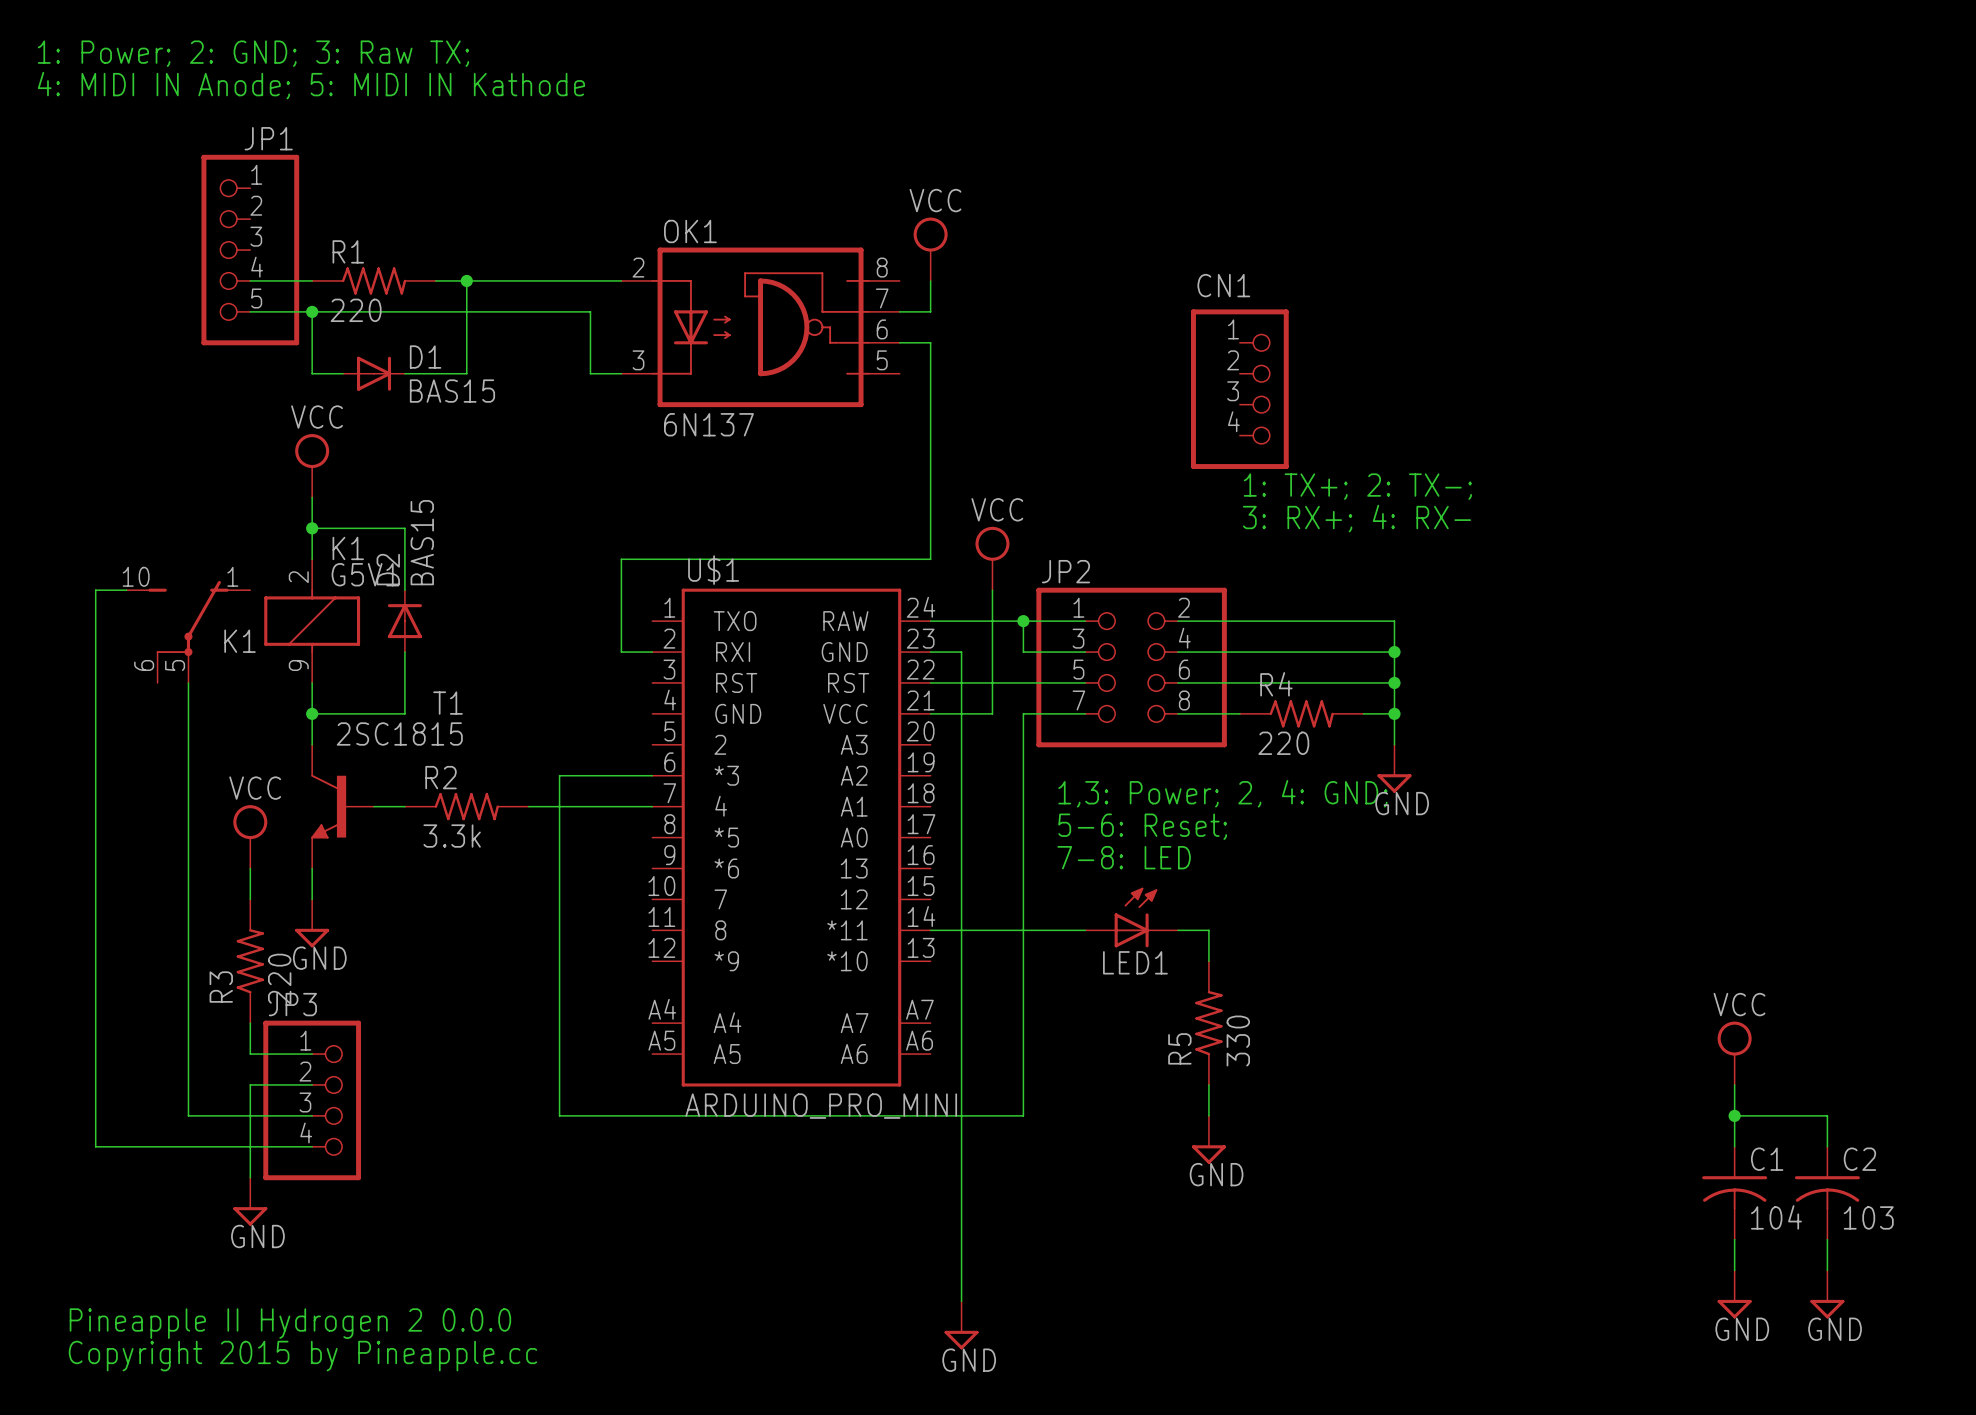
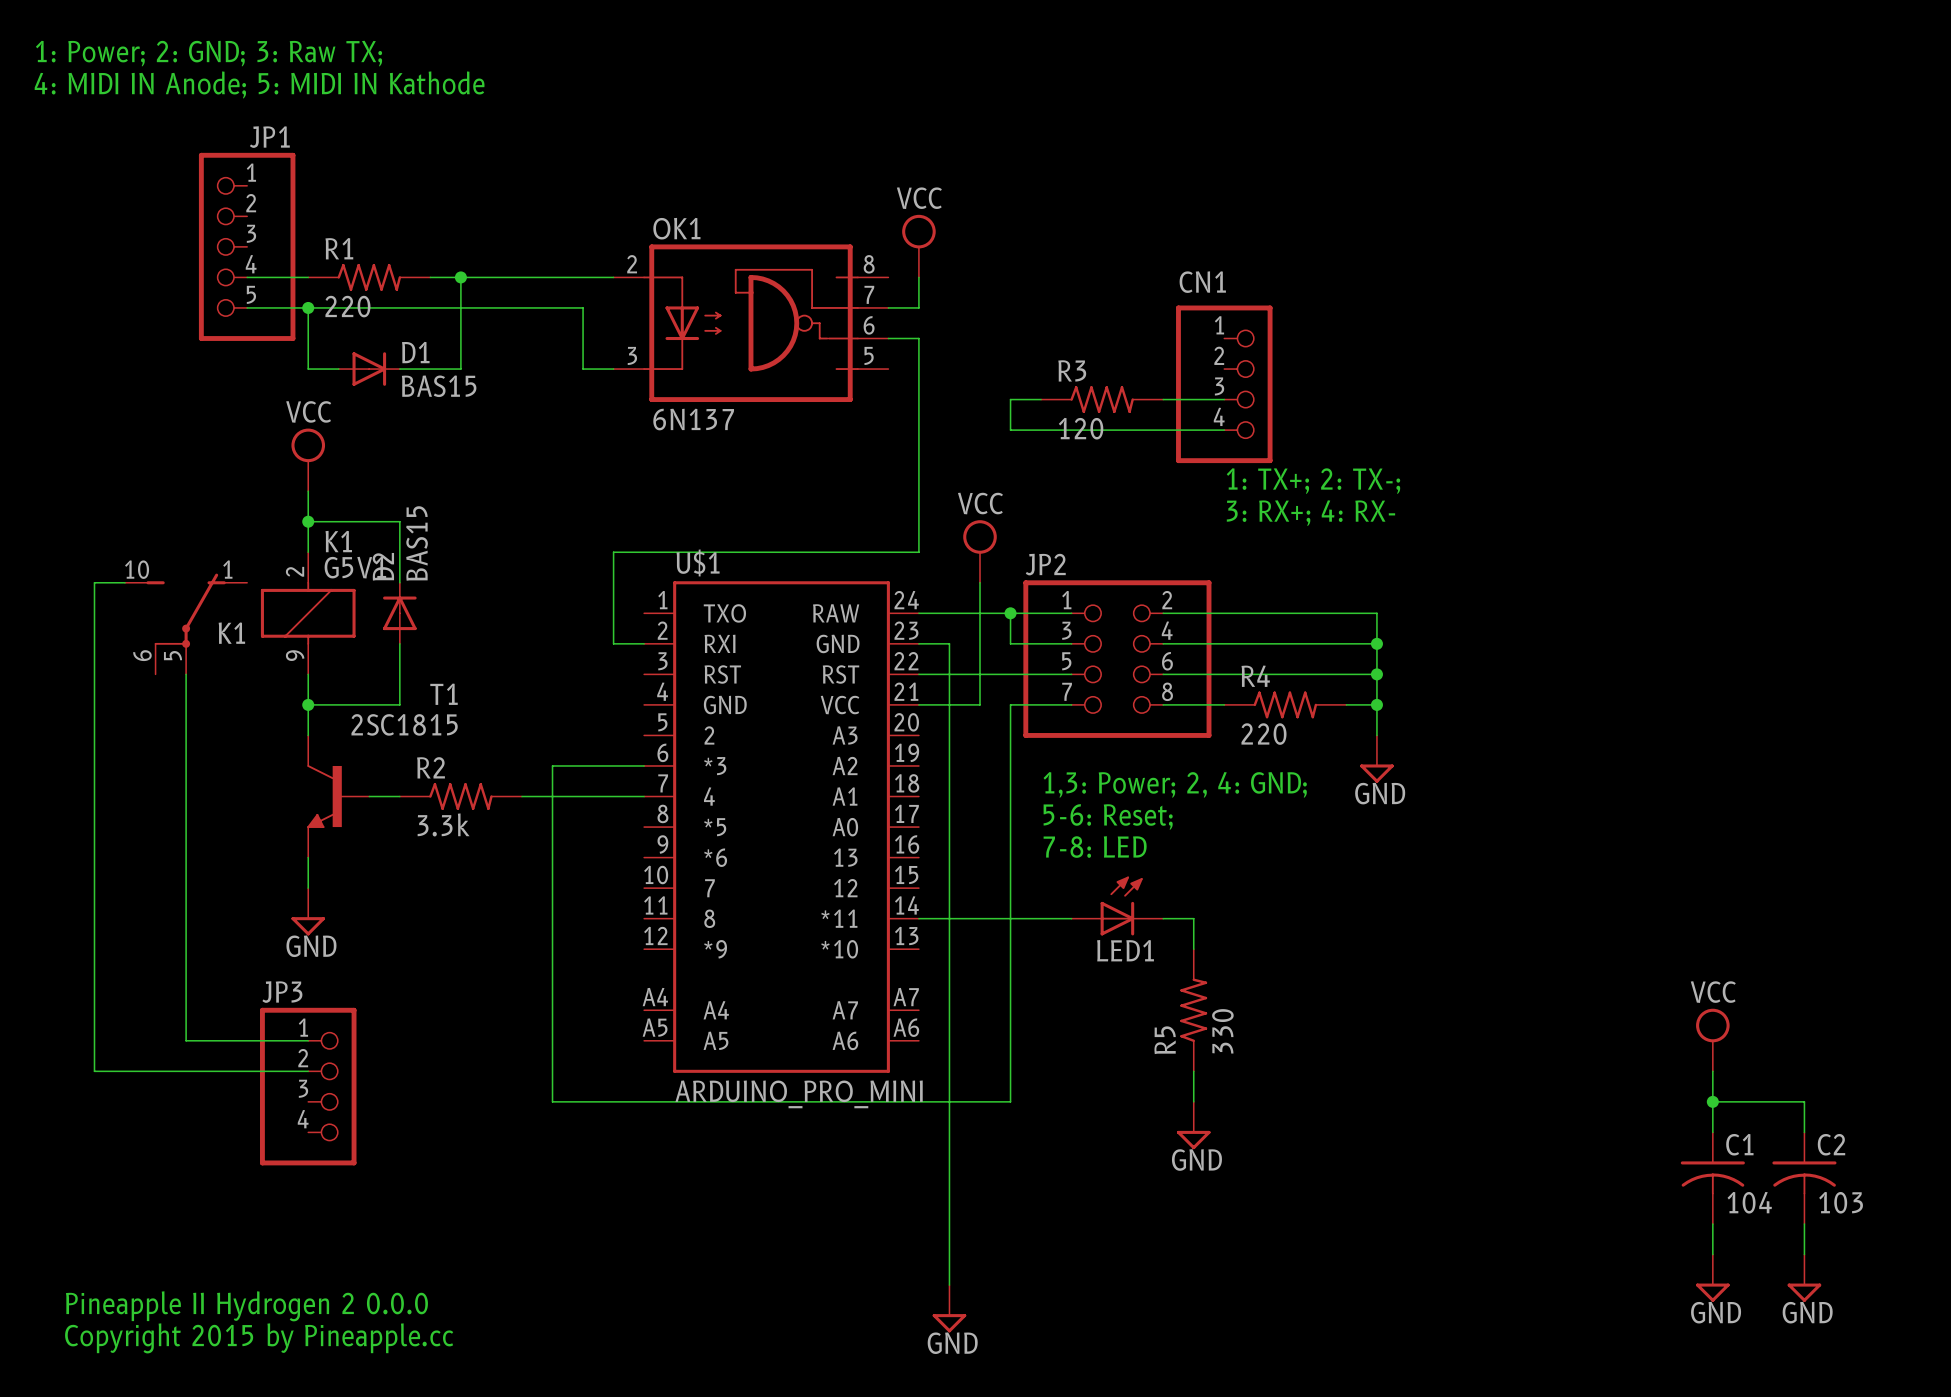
wire: none -> (1041, 399) (1010, 399) (1010, 430) (1224, 430)
wire: none -> (1163, 399) (1224, 399)
power symbol: VCC (250, 836) -> none
wire: (250, 868) (250, 899) -> none
R3 rotation: 0° (250, 961) -> 90° clockwise (1102, 399)
R3 position: (250, 961) -> (1102, 399)
R3 value: 220 (279, 979) -> 120 (1081, 428)
wire: (250, 1023) (250, 1054) -> (186, 1040) (247, 1040)
wire: (188, 1054) (188, 1115) (312, 1115) -> none
wire: (95, 1084) (95, 1146) (312, 1146) -> (94, 1071) (247, 1071)
wire: (250, 1084) (250, 1177) -> none
power symbol: GND (250, 1201) -> none

